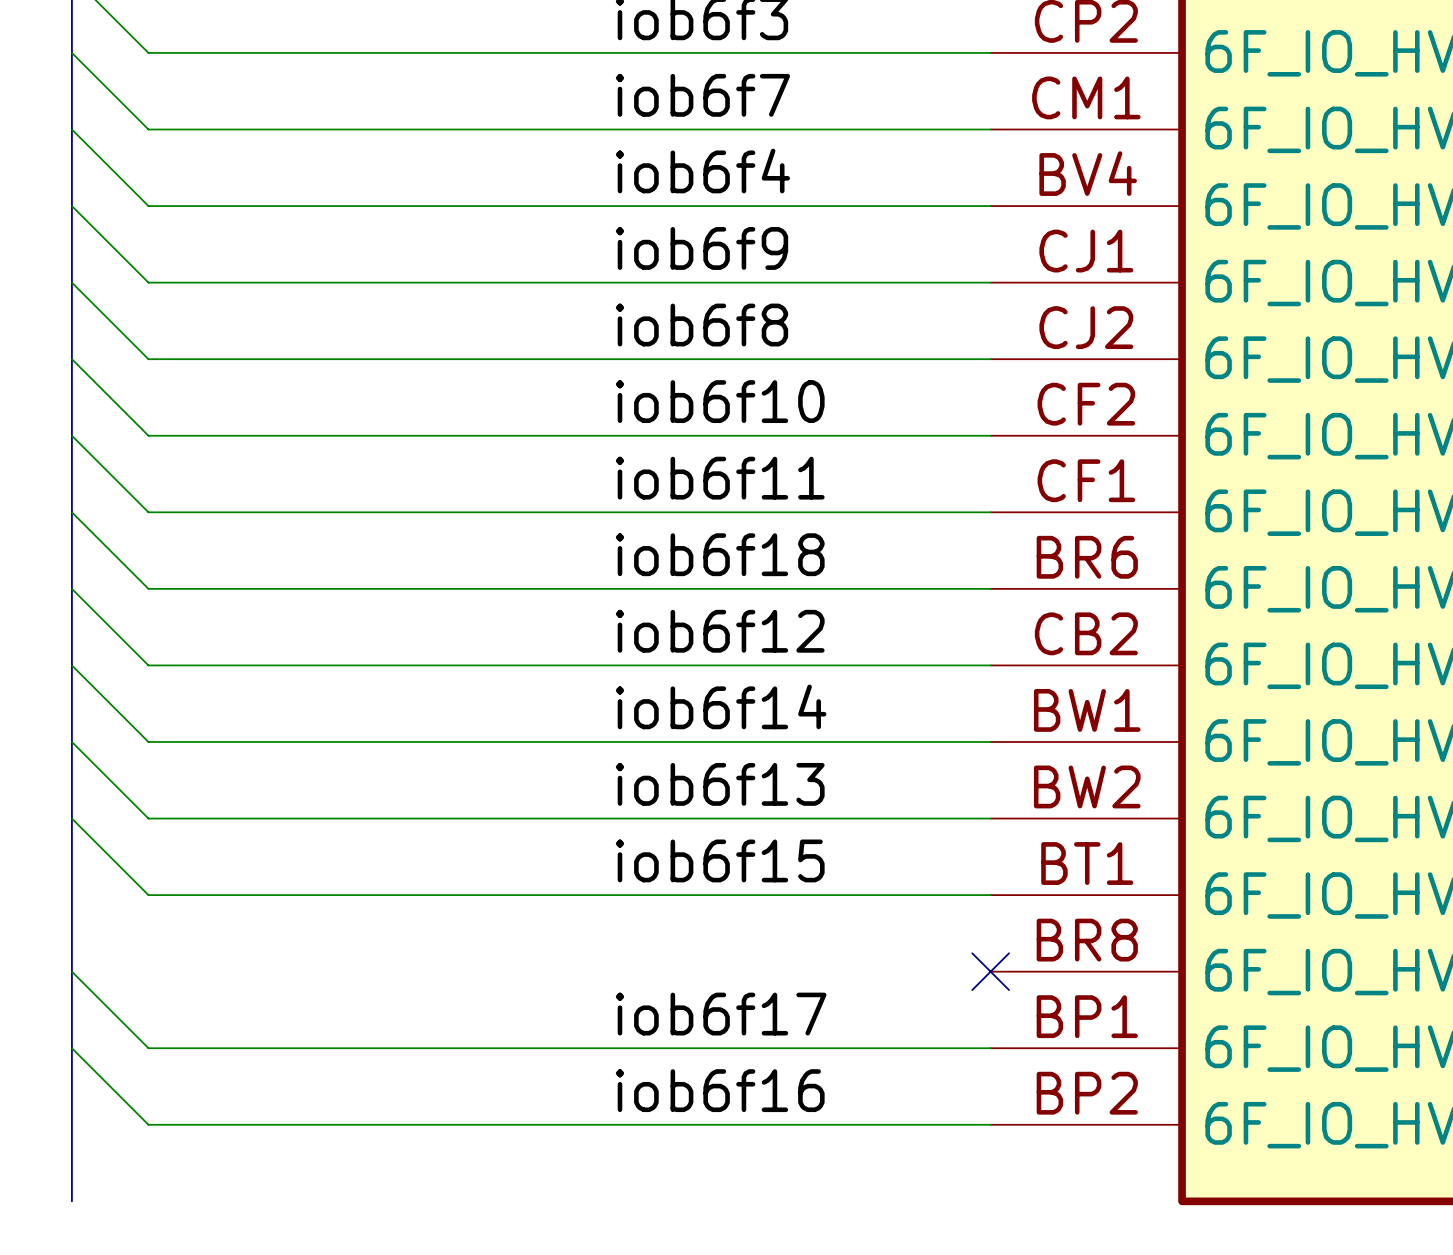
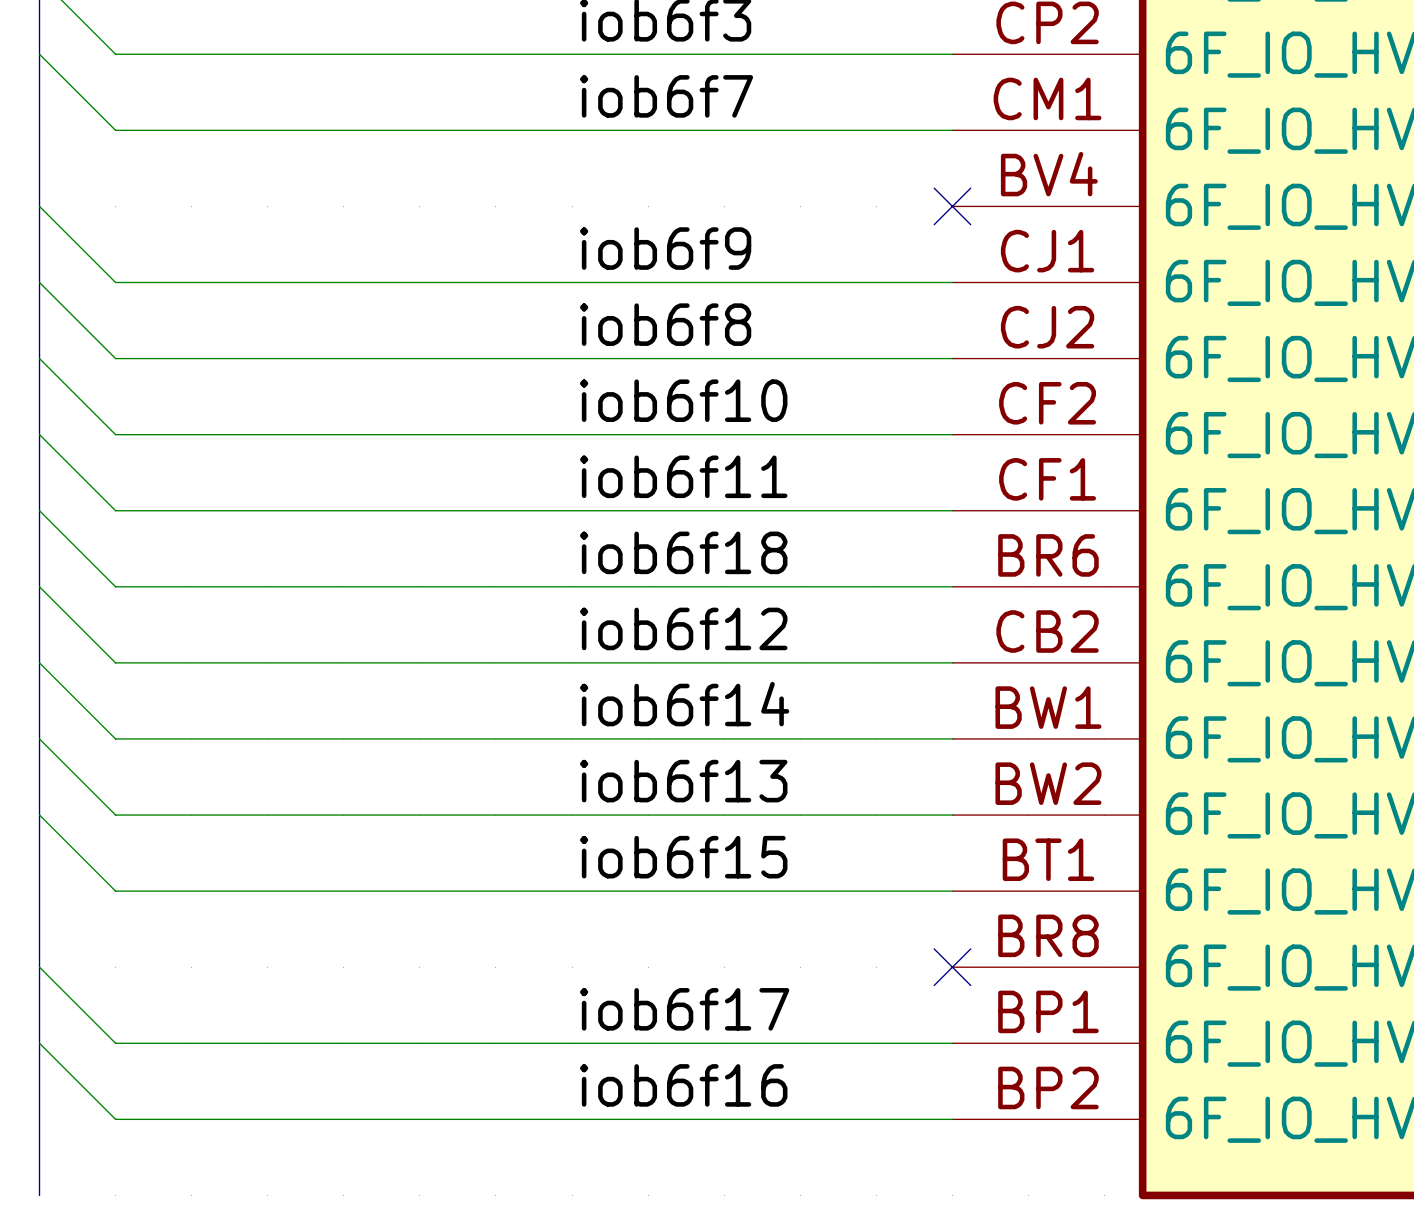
wire: (71, 129) (148, 206) (990, 206) -> none
label: iob6f4 (702, 170) -> none
no-connect mark: none -> (952, 206)

